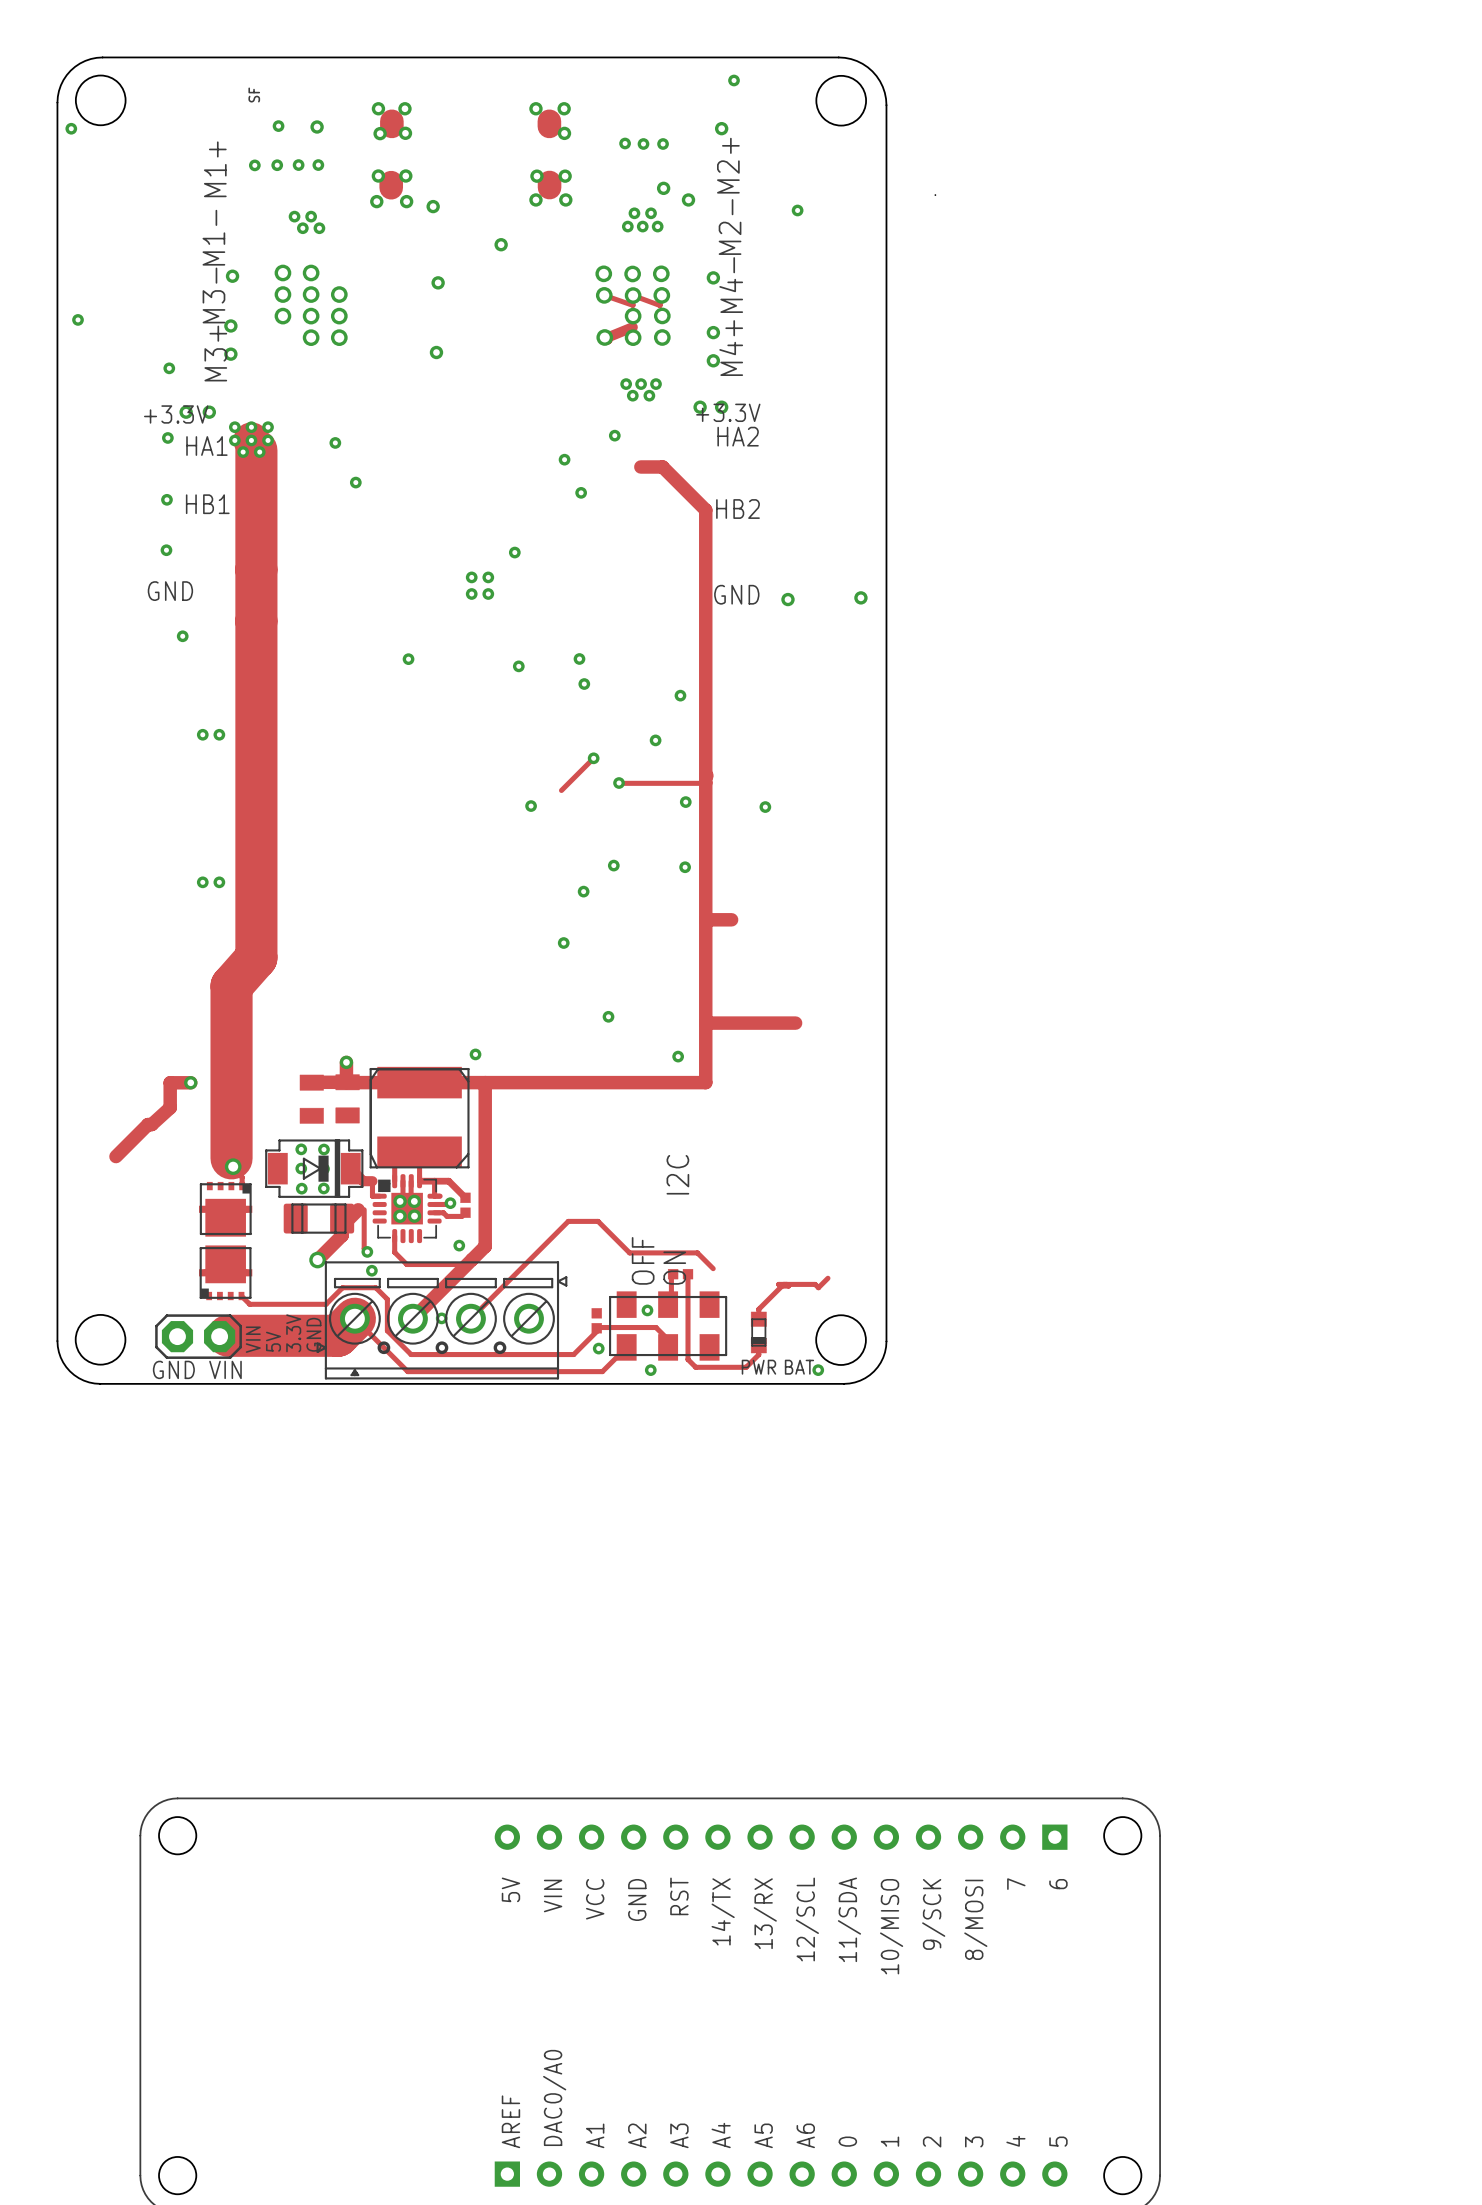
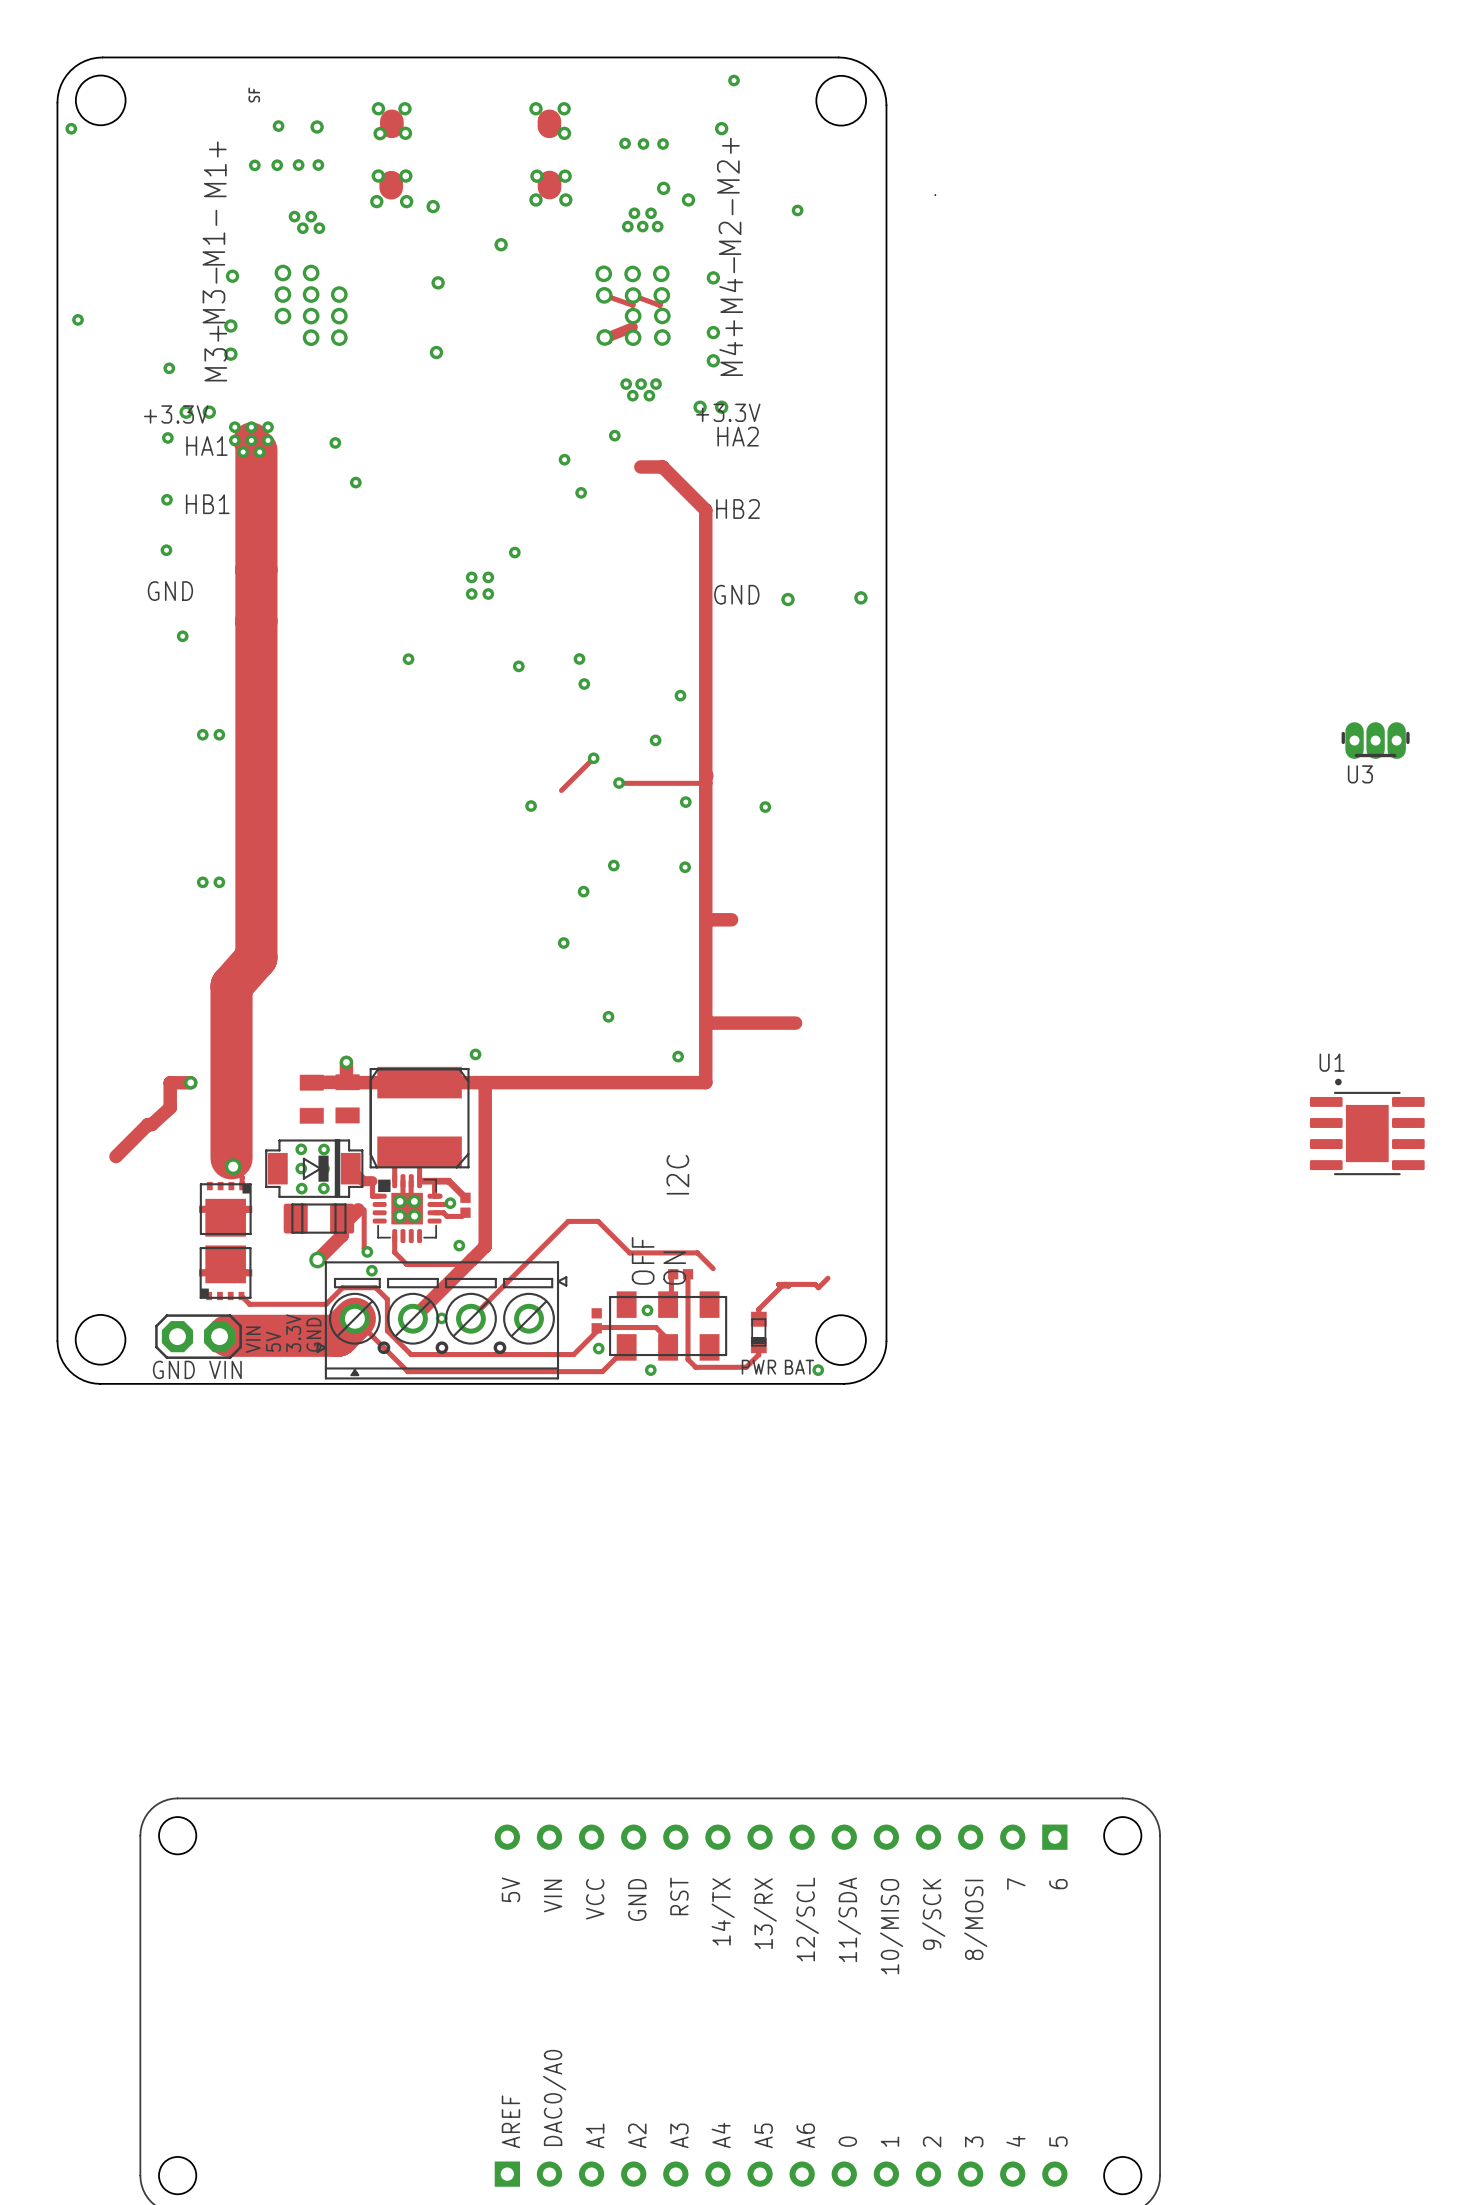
U3: none -> (1375, 740)
U1: none -> (1367, 1126)

